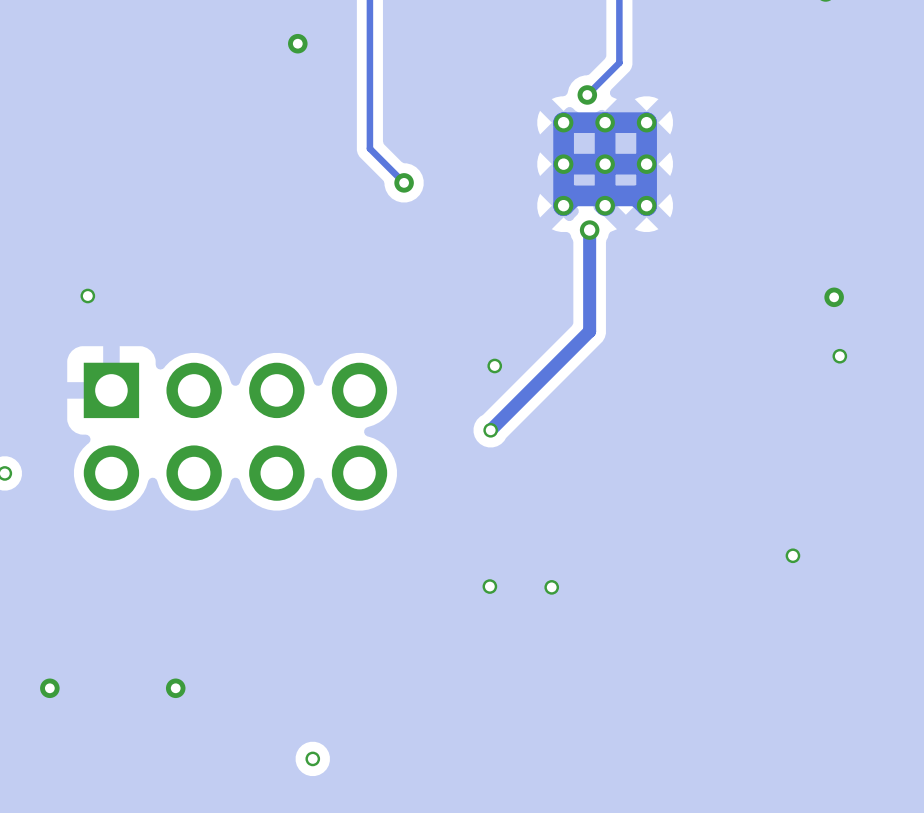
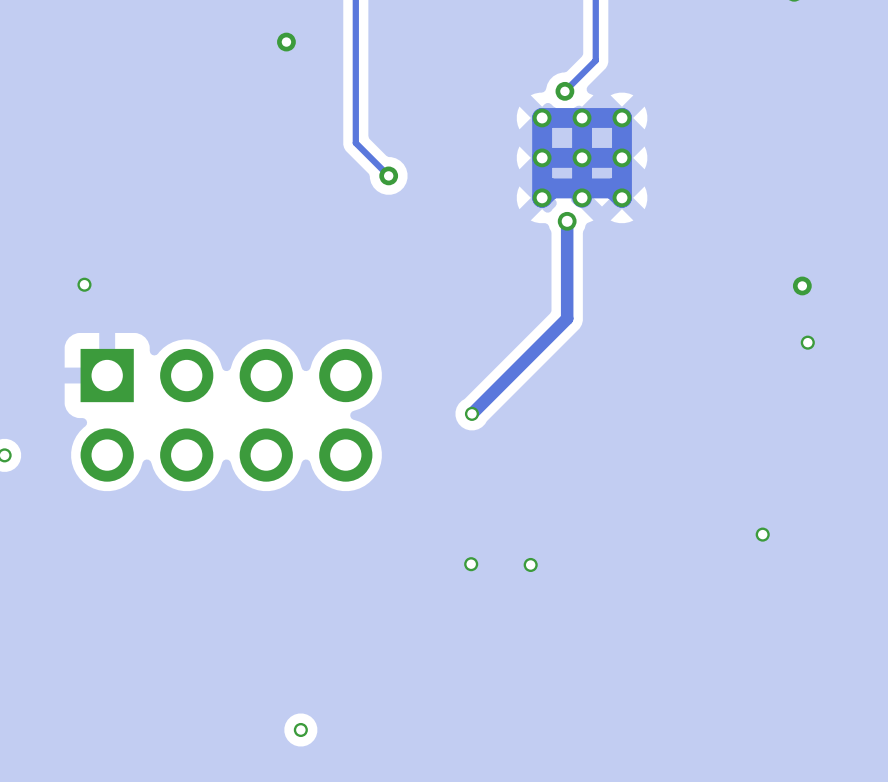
via: (494, 365) -> none
via: (49, 688) -> none
via: (175, 688) -> none

